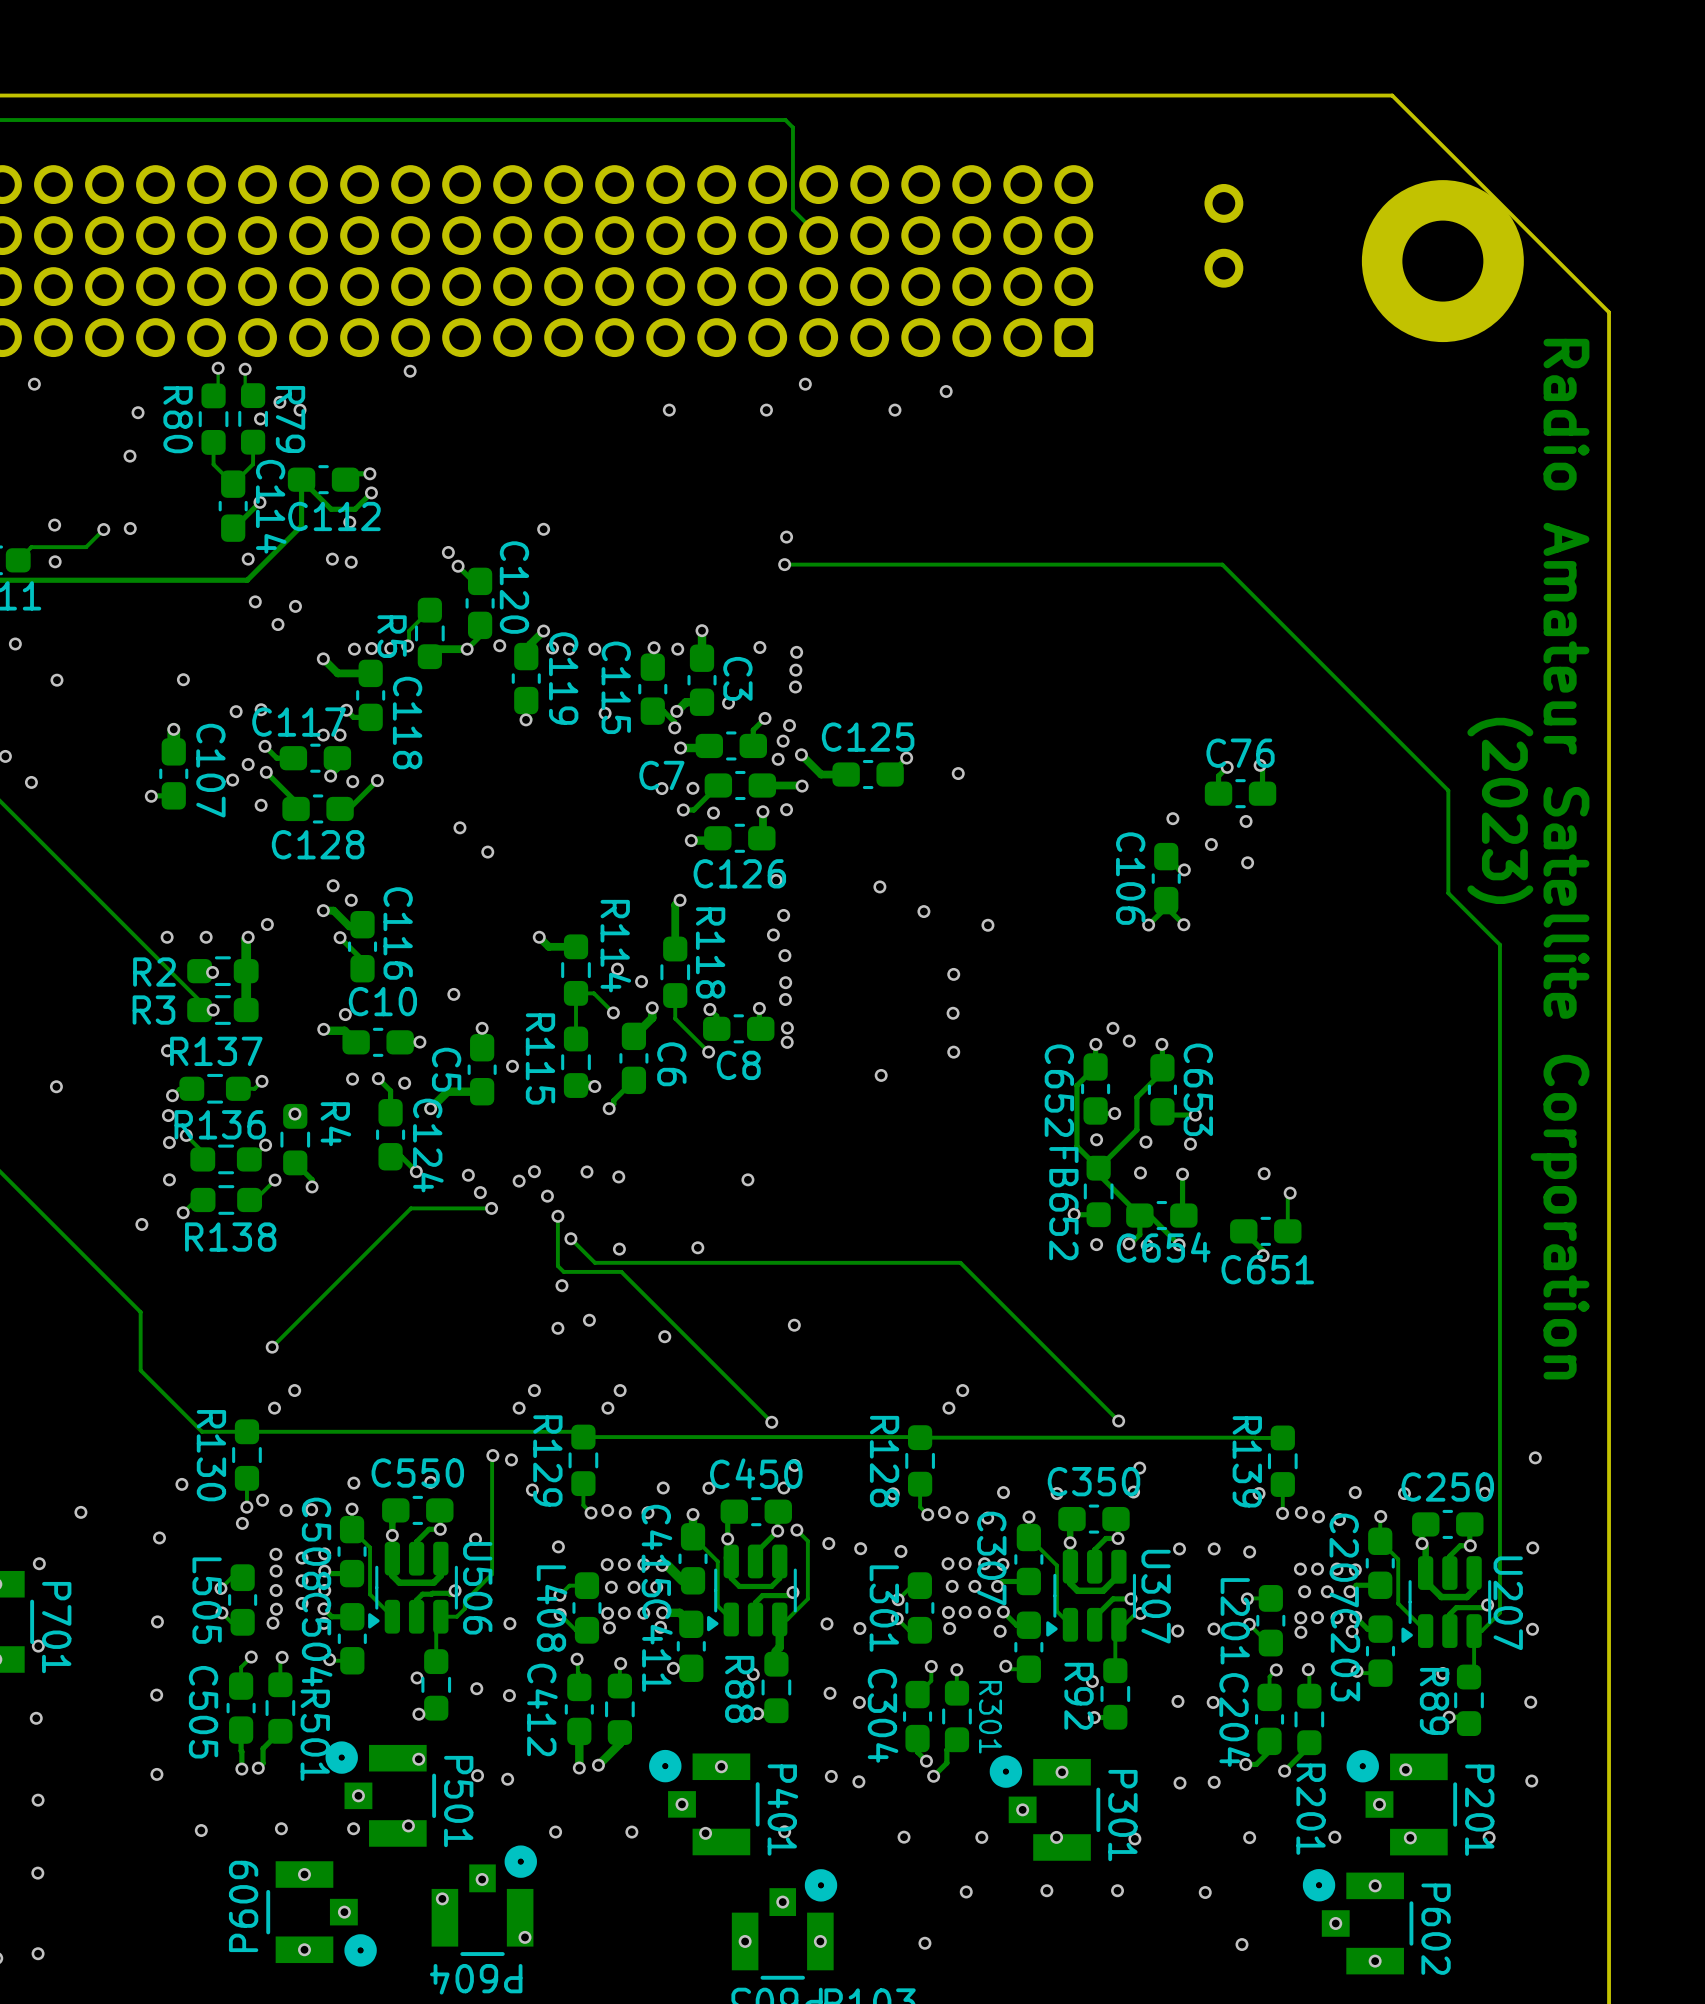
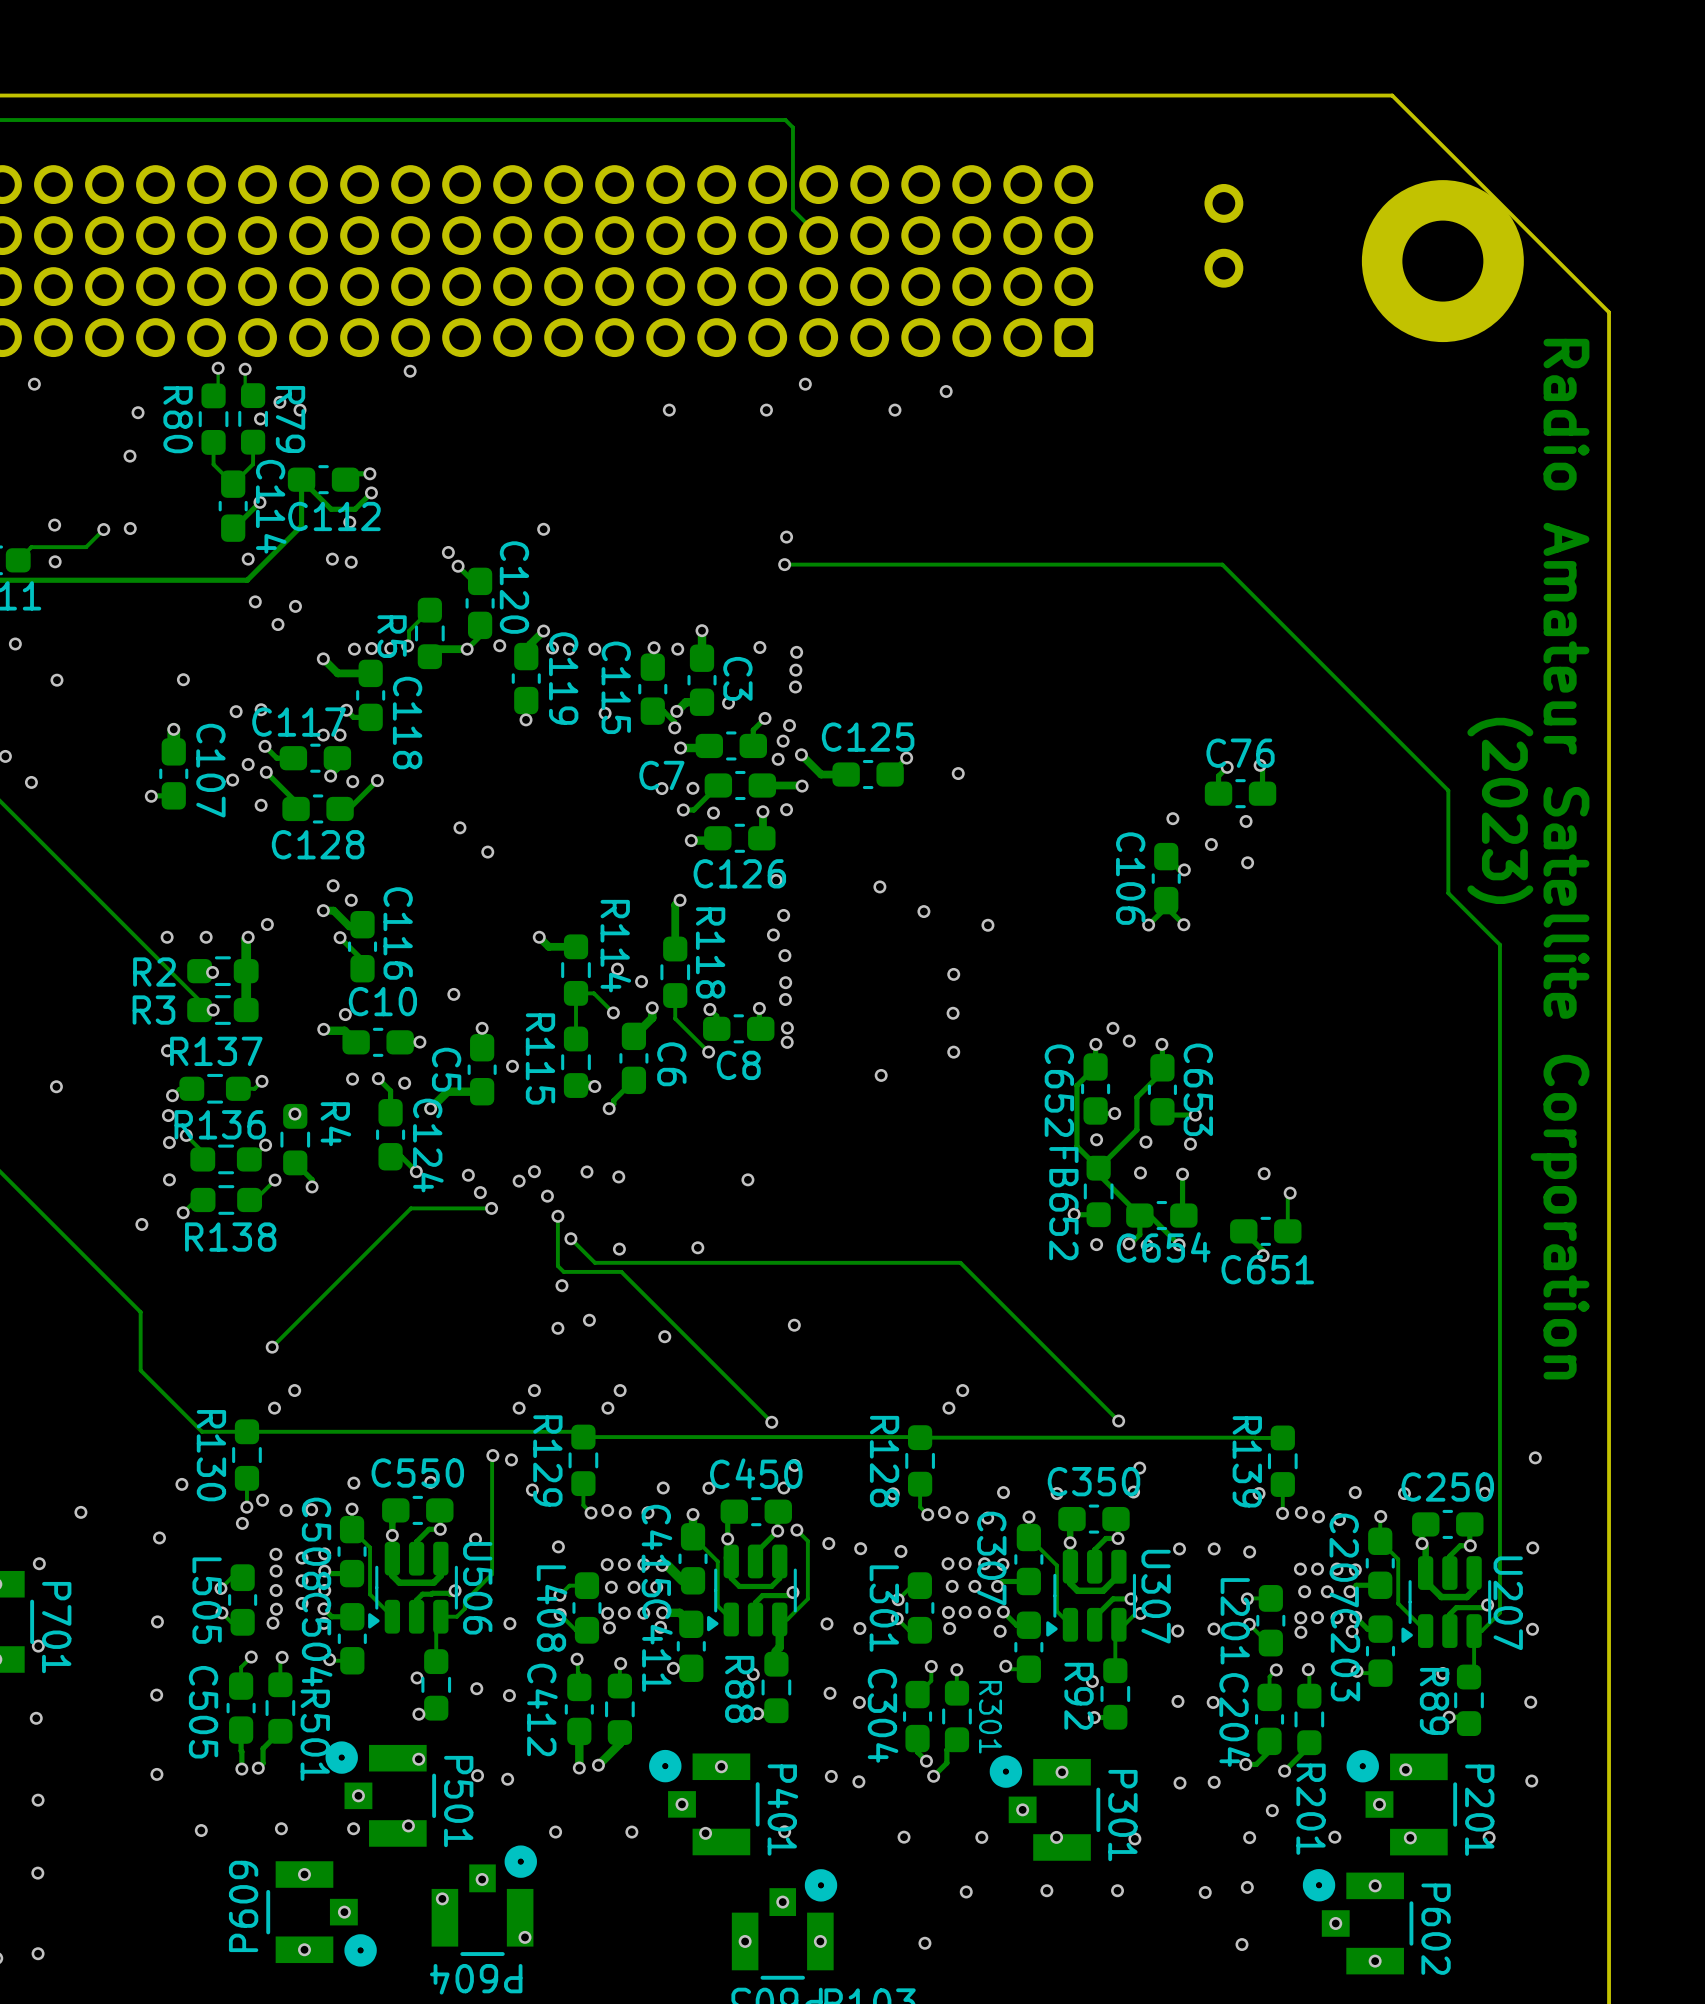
via: none -> (1272, 1810)
via: none -> (1247, 1887)

